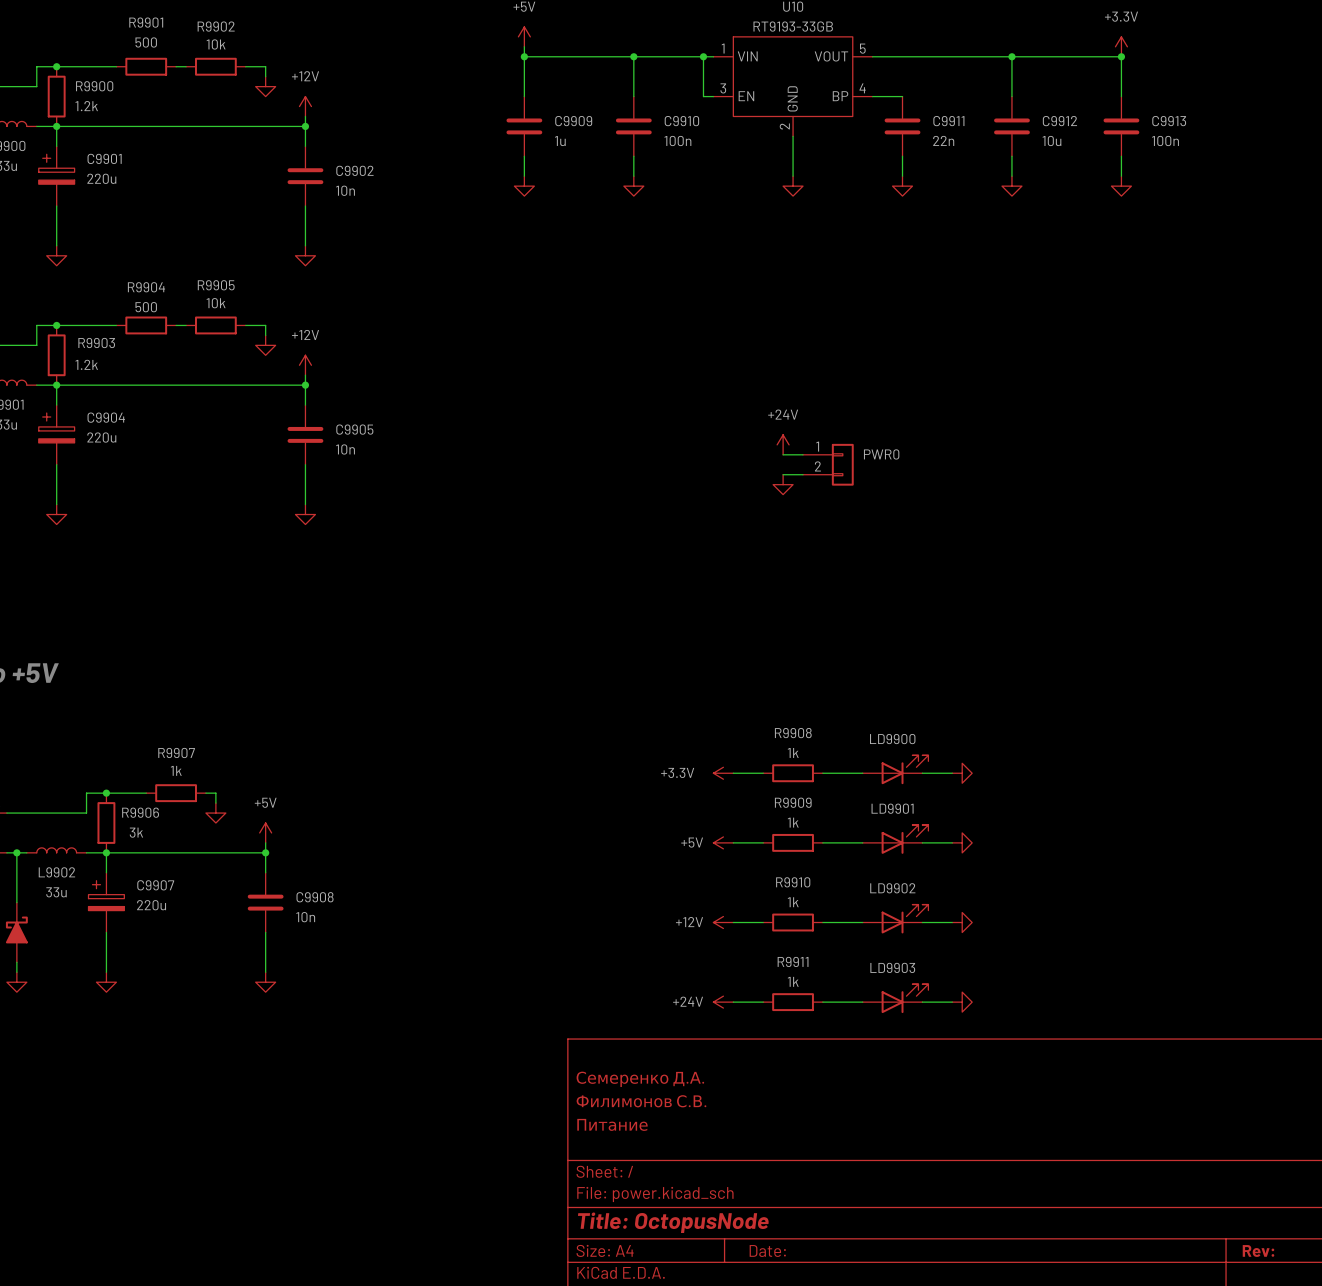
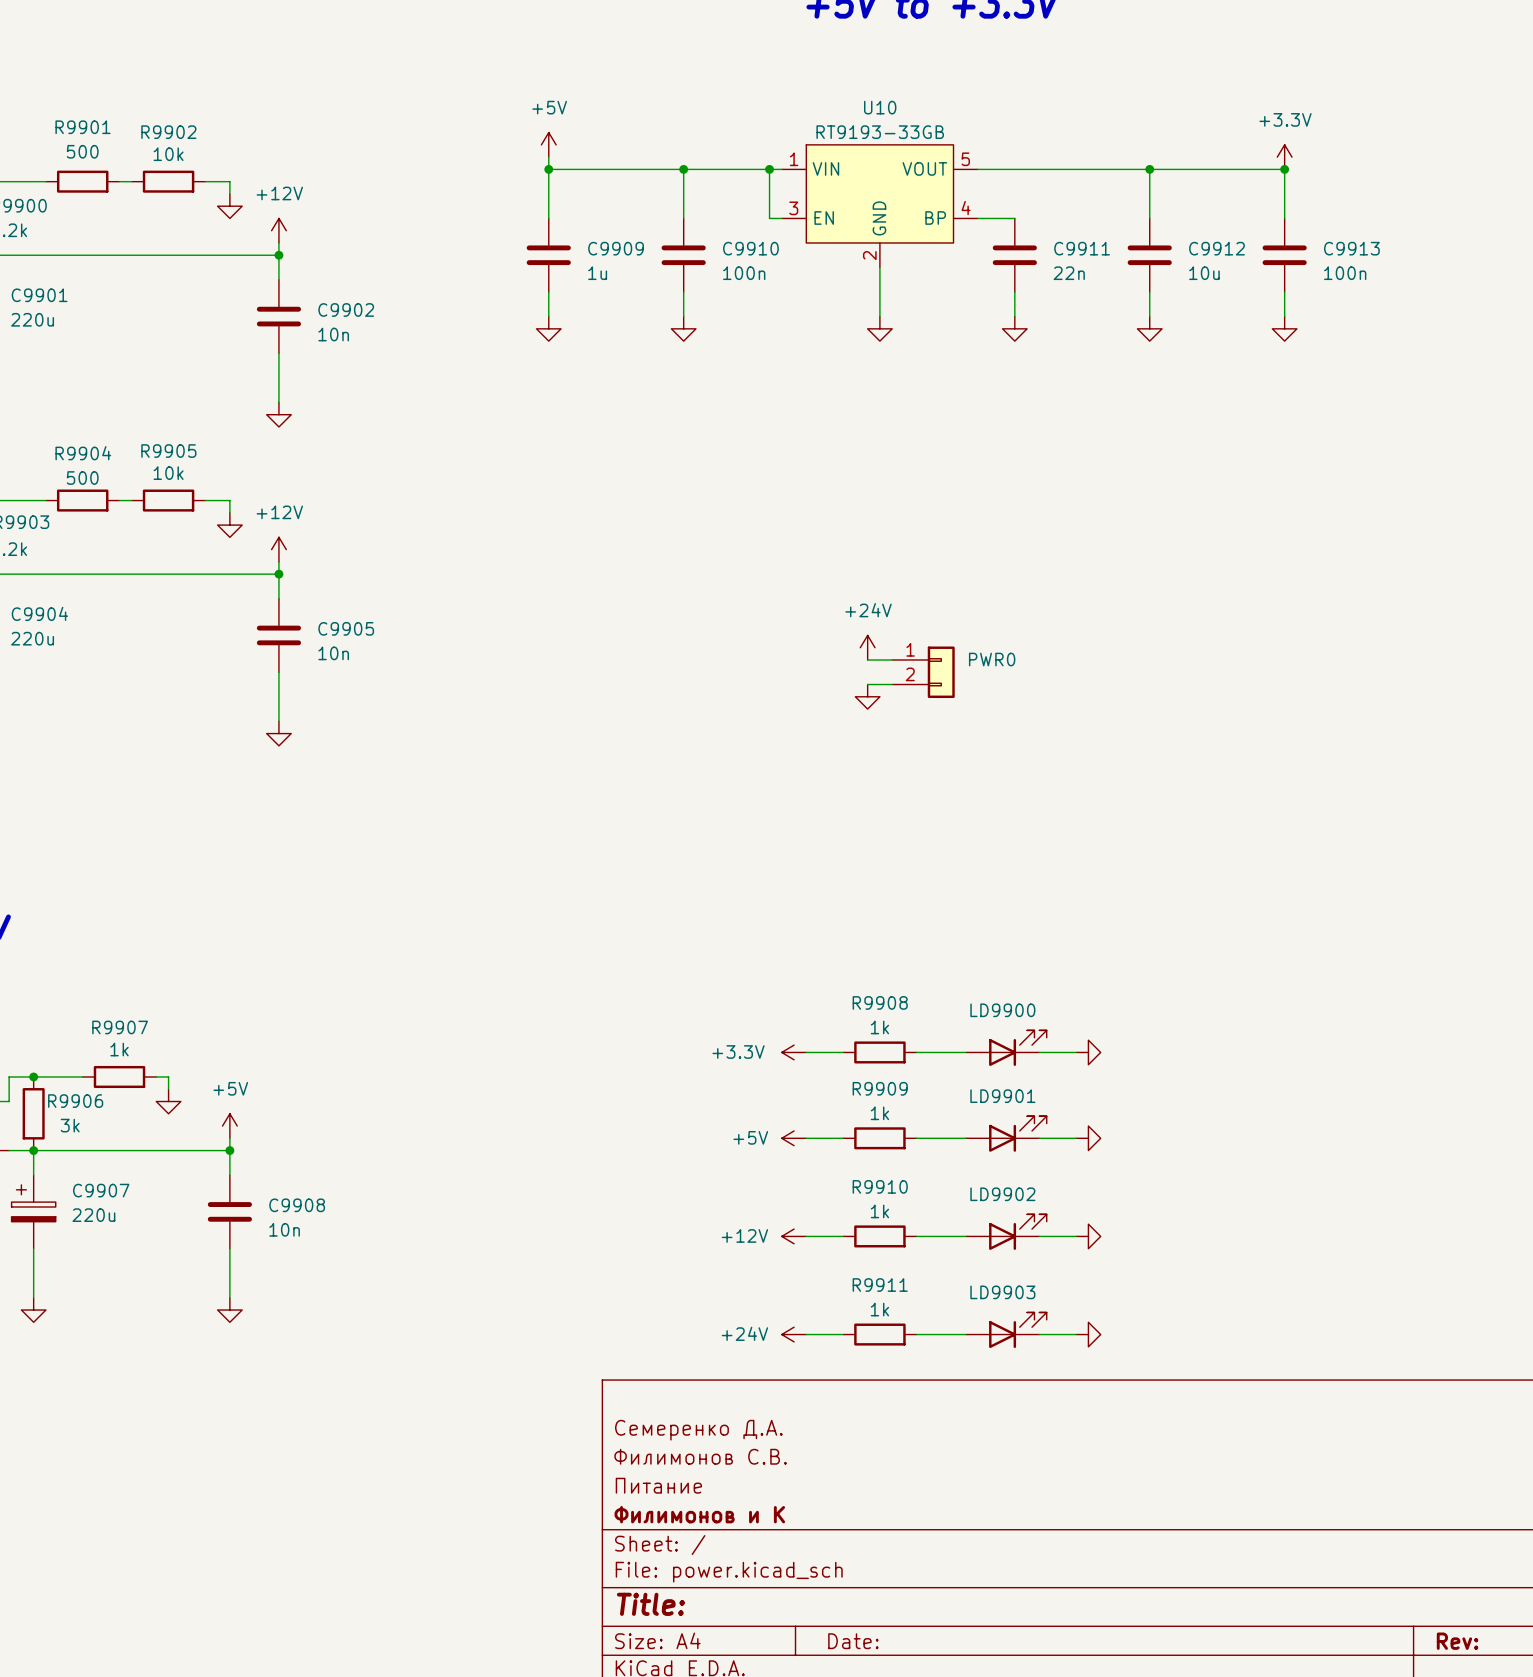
title block: none -> Филимонов и К (699, 1514)
title block: Title: OctopusNode (673, 1222) -> Title: (650, 1604)

